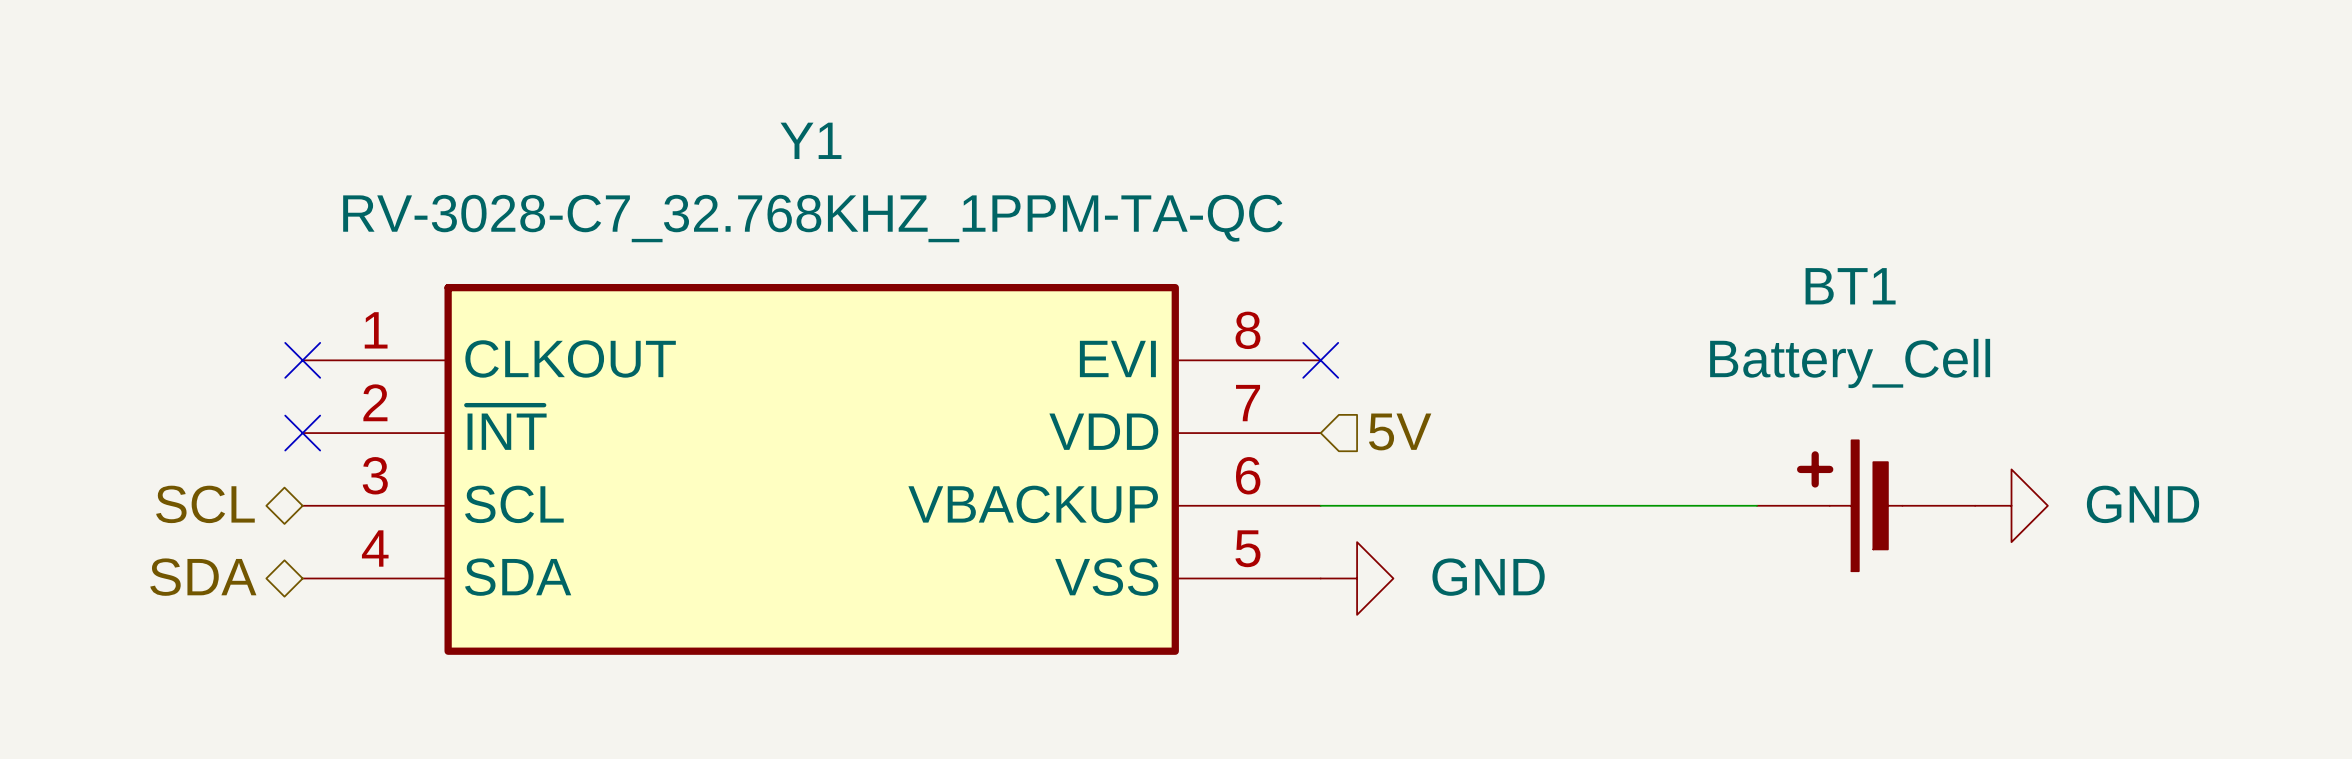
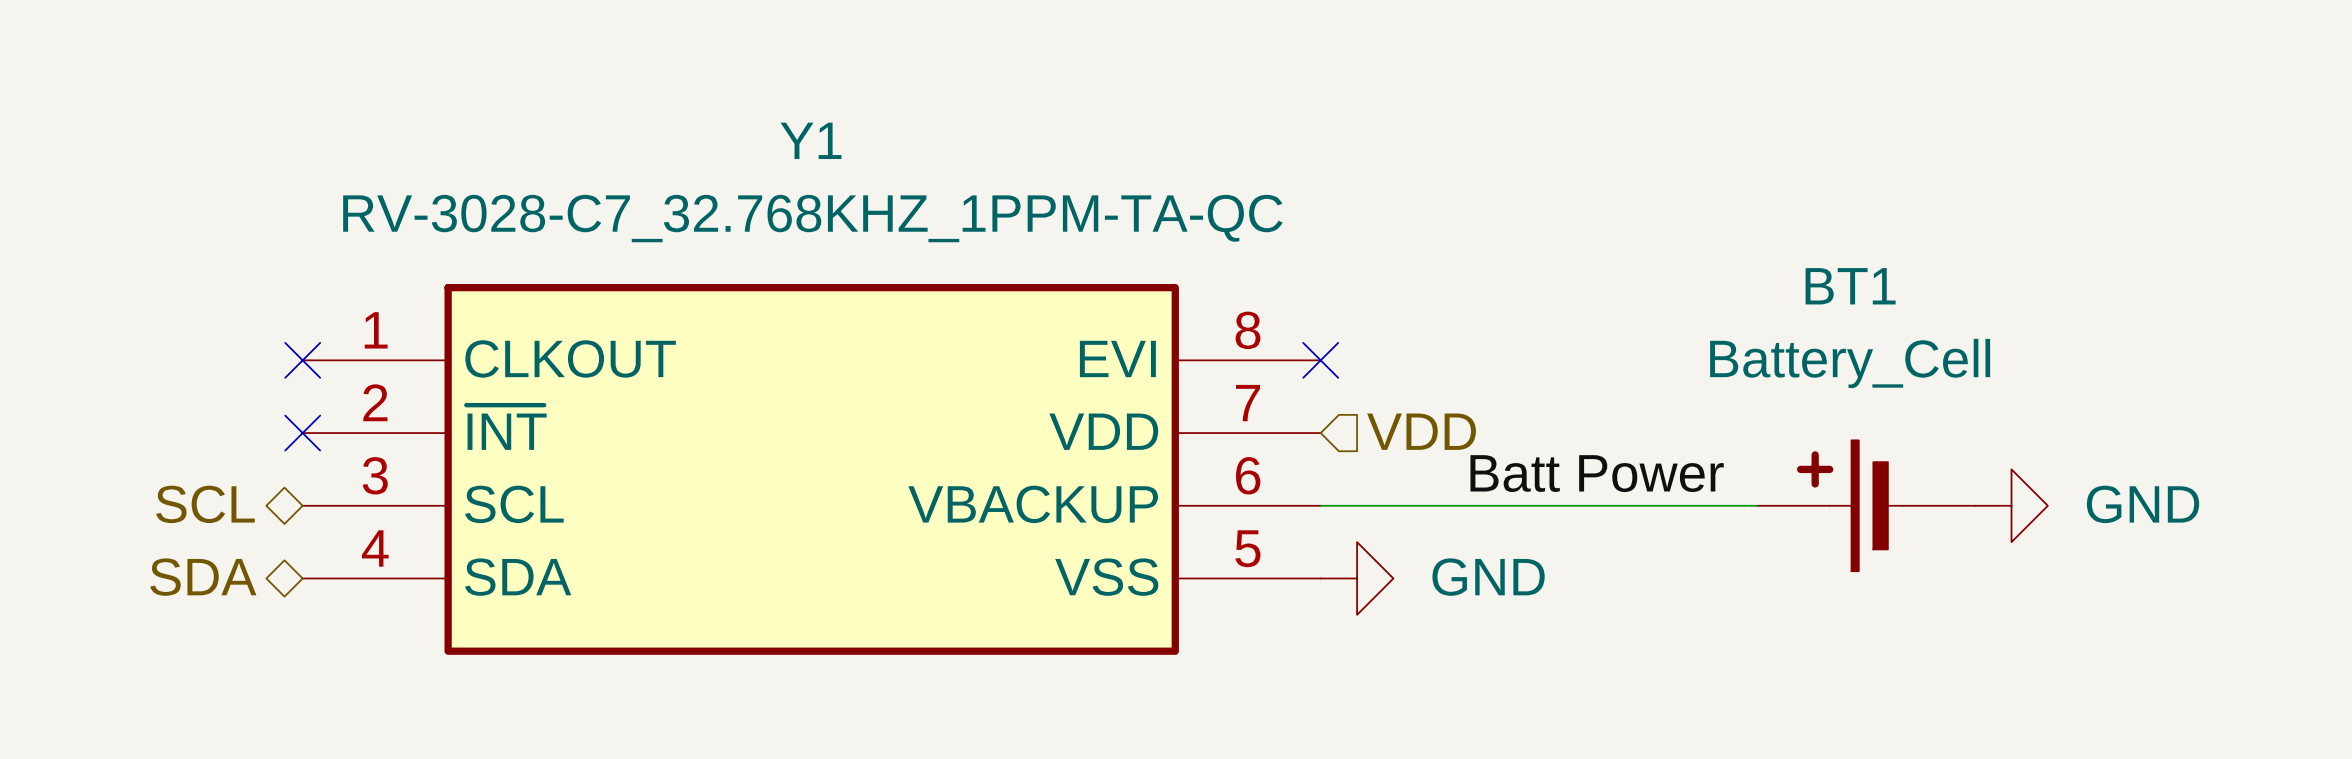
hierarchical label: 5V (1400, 431) -> VDD (1421, 431)
label: none -> Batt Power (1597, 473)

